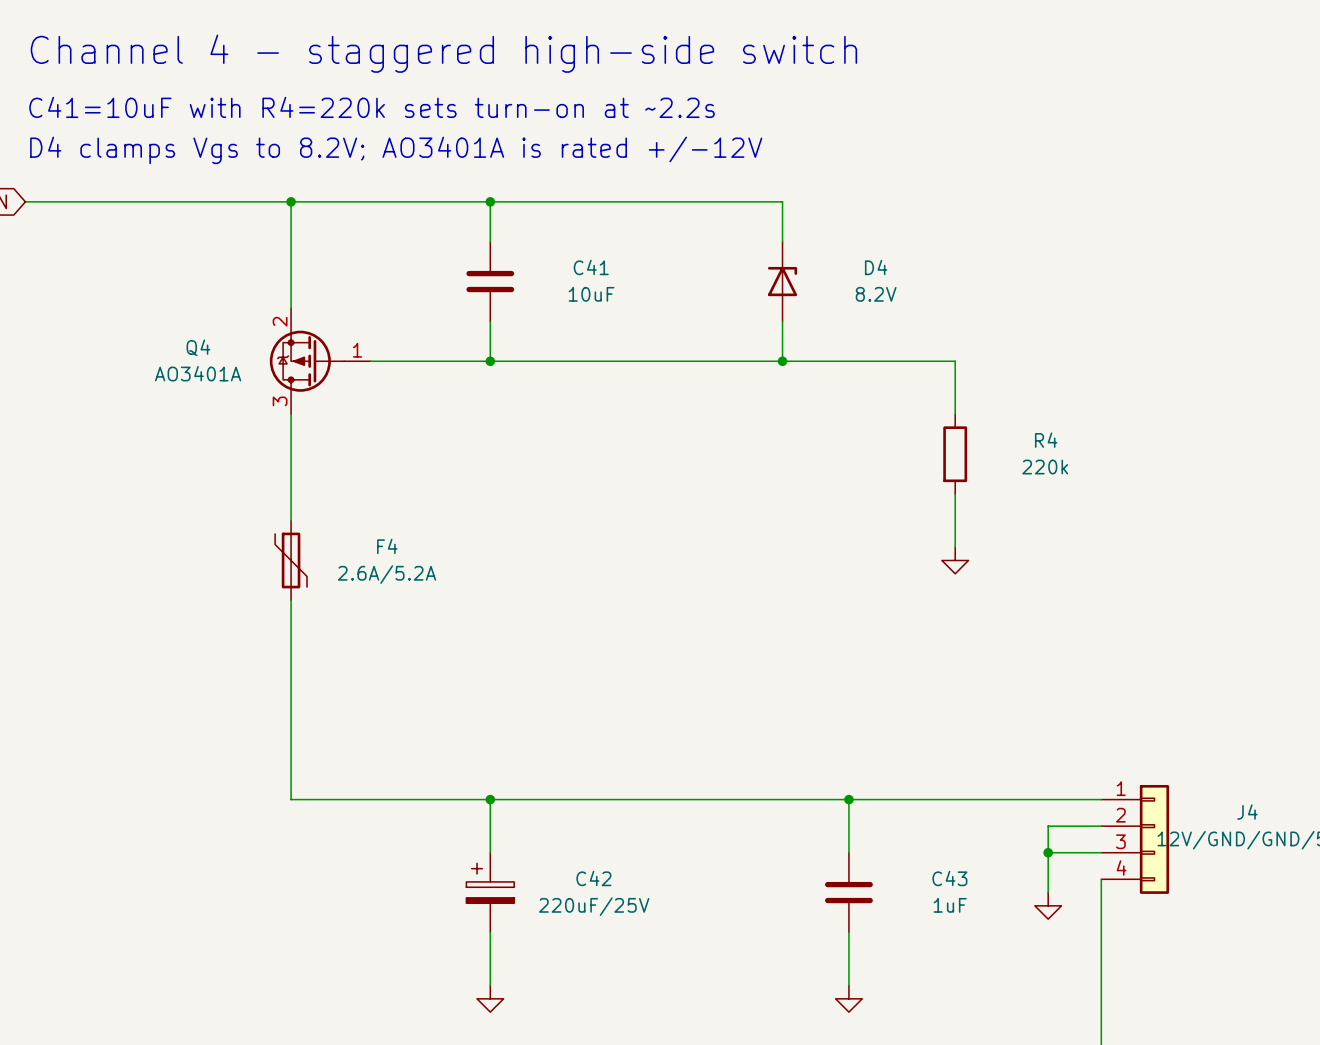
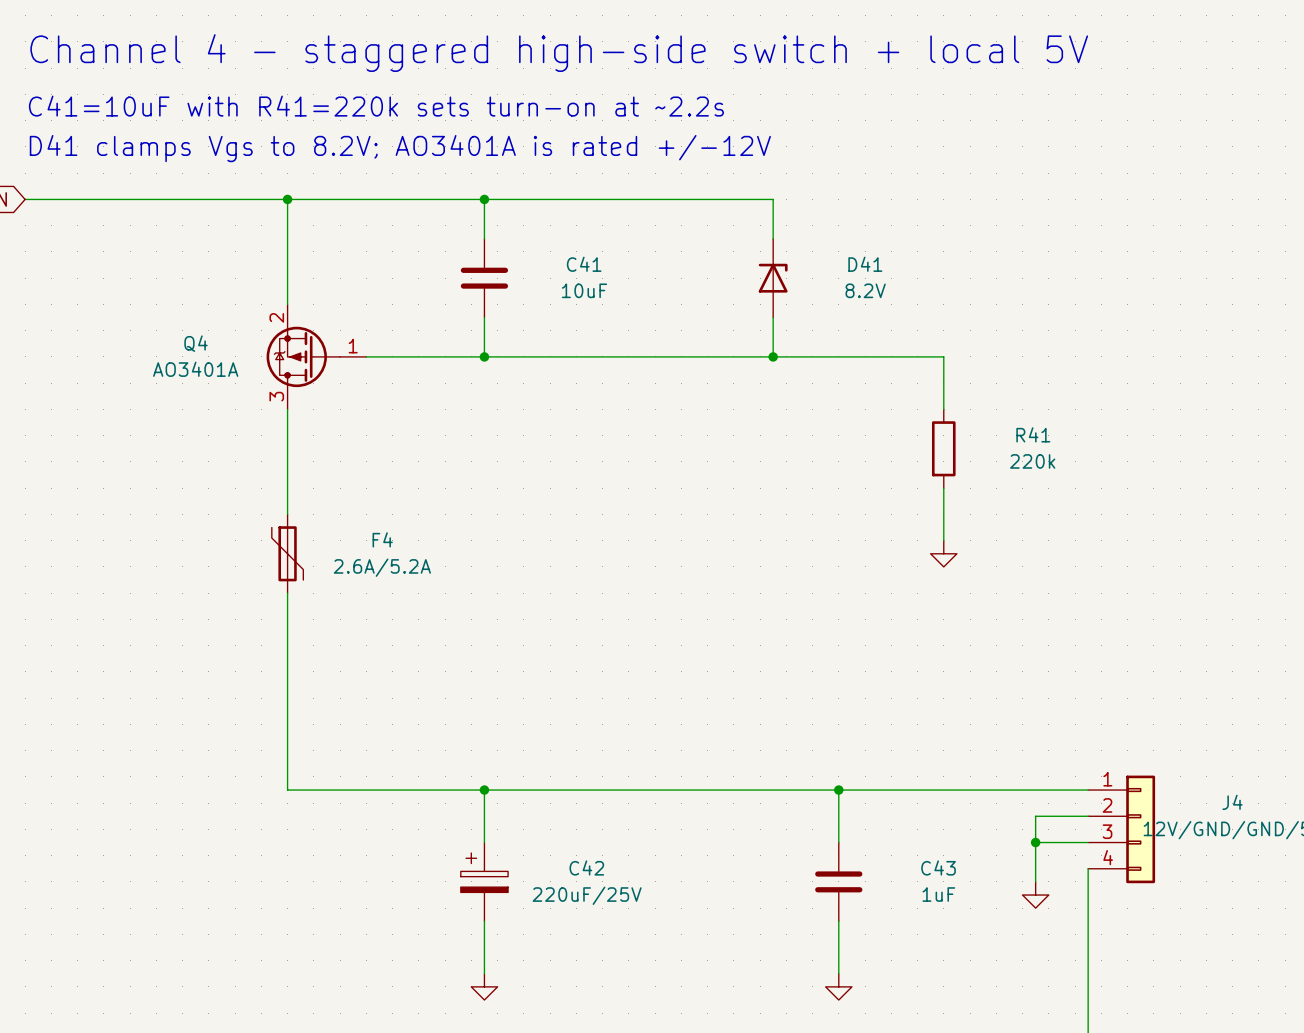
text: Channel 4 - staggered high-side switch (443, 53) -> Channel 4 - staggered high-side switch + local 5V (559, 53)
text: C41=10uF with R4=220k sets turn-on at ~2.2s (372, 107) -> C41=10uF with R41=220k sets turn-on at ~2.2s (376, 106)
text: D4 clamps Vgs to 8.2V; AO3401A is rated +/-12V (396, 150) -> D41 clamps Vgs to 8.2V; AO3401A is rated +/-12V (400, 148)
D4 name: D4 (876, 267) -> D41 (865, 264)
R4 name: R4 (1046, 440) -> R41 (1033, 434)

